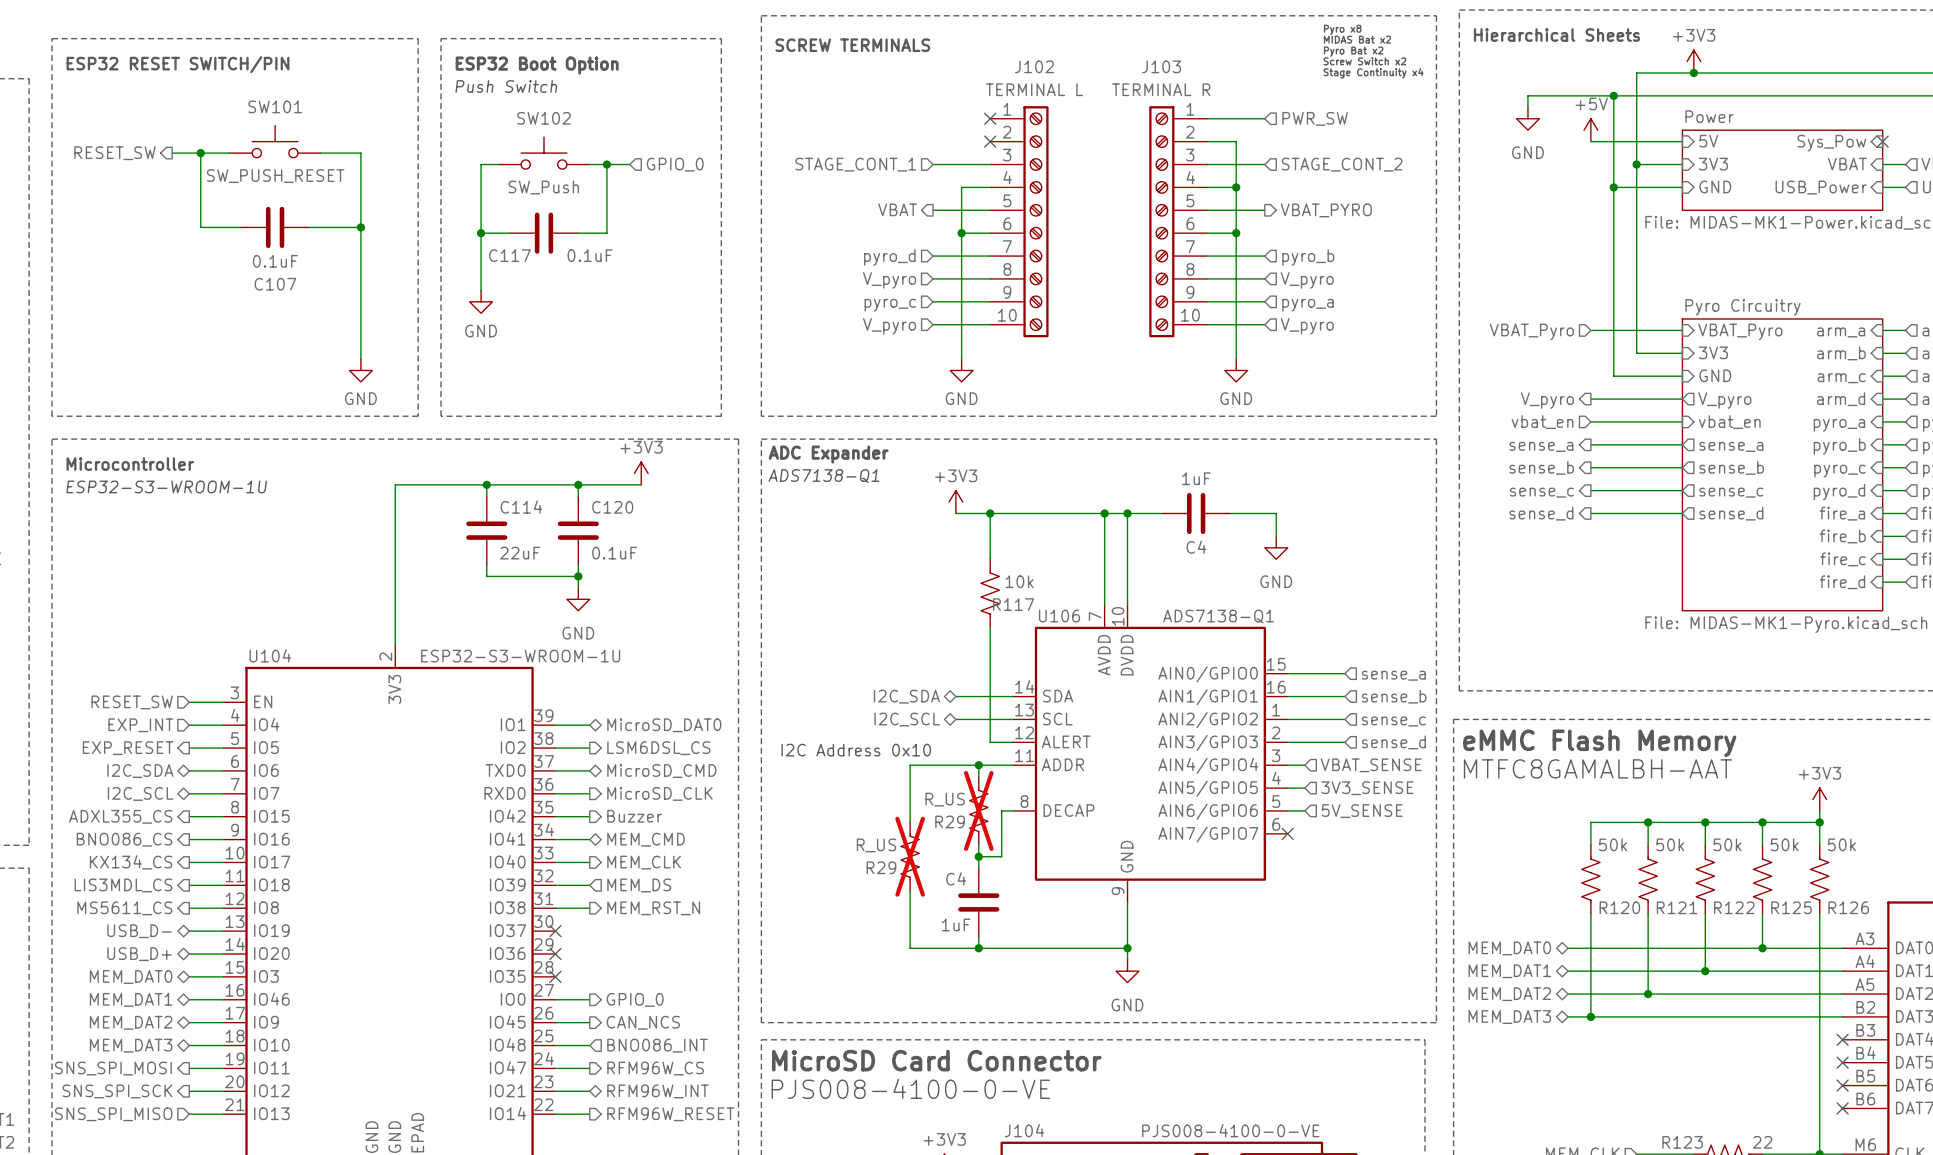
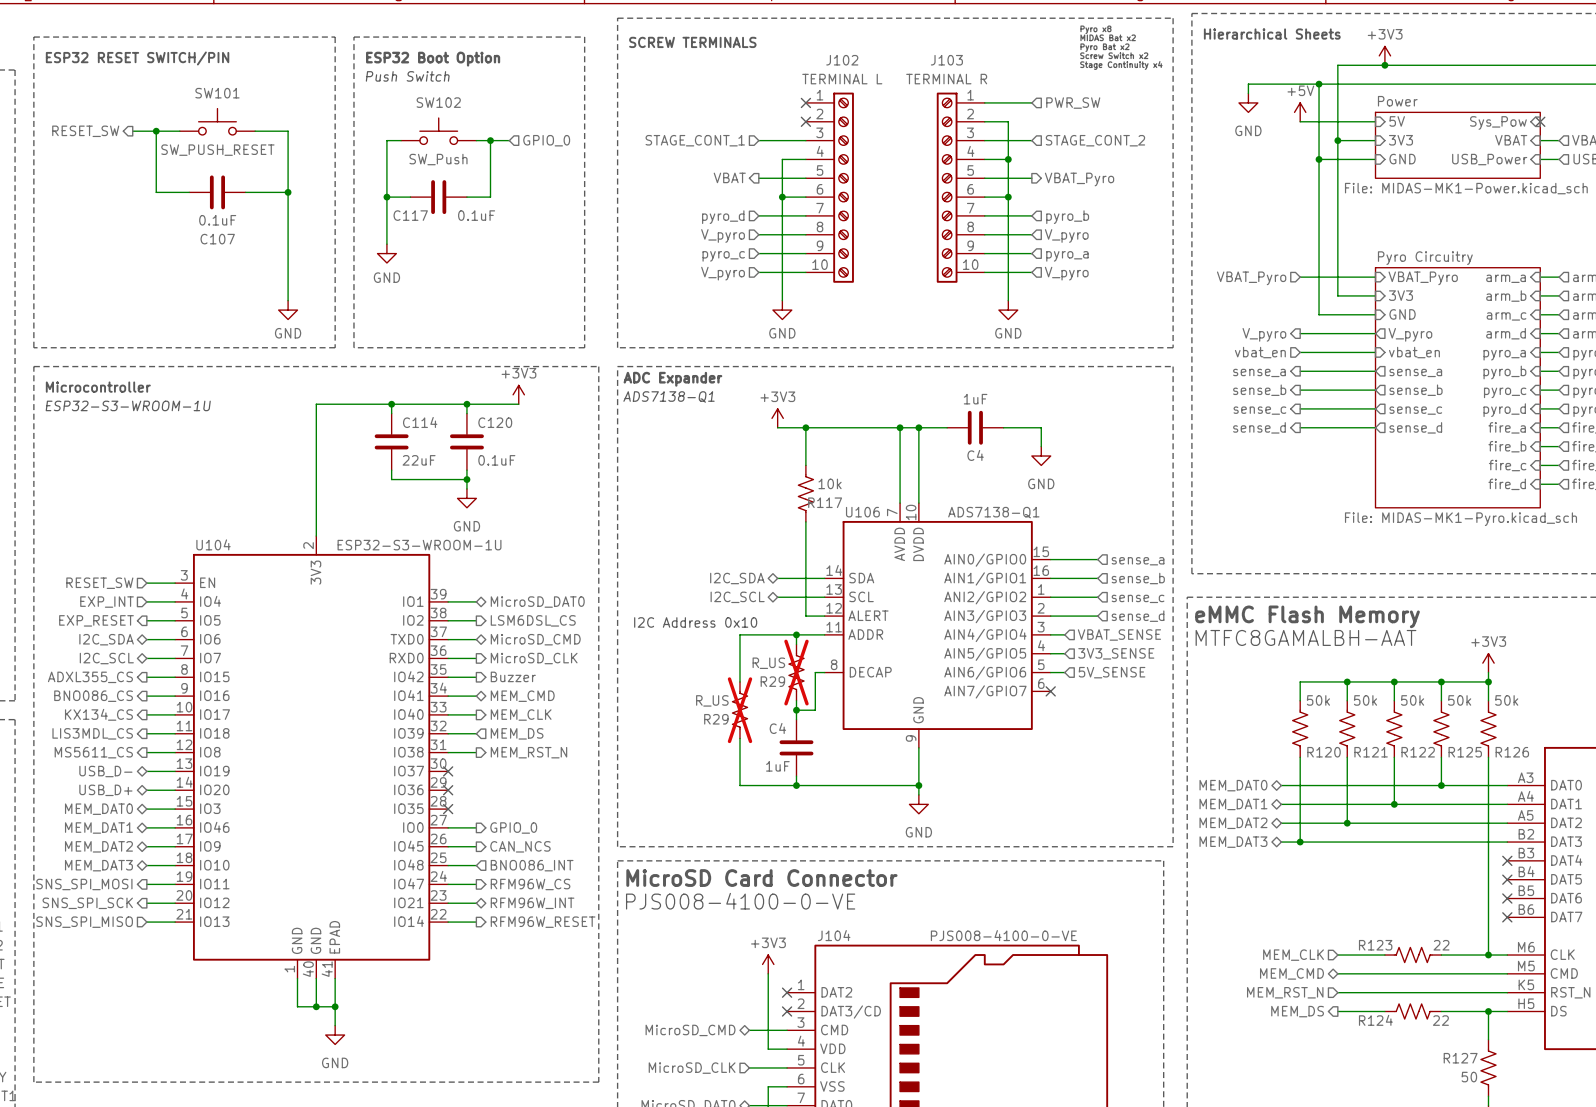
hierarchical label: VBAT_PYRO (1326, 210) -> VBAT_Pyro (1079, 179)

